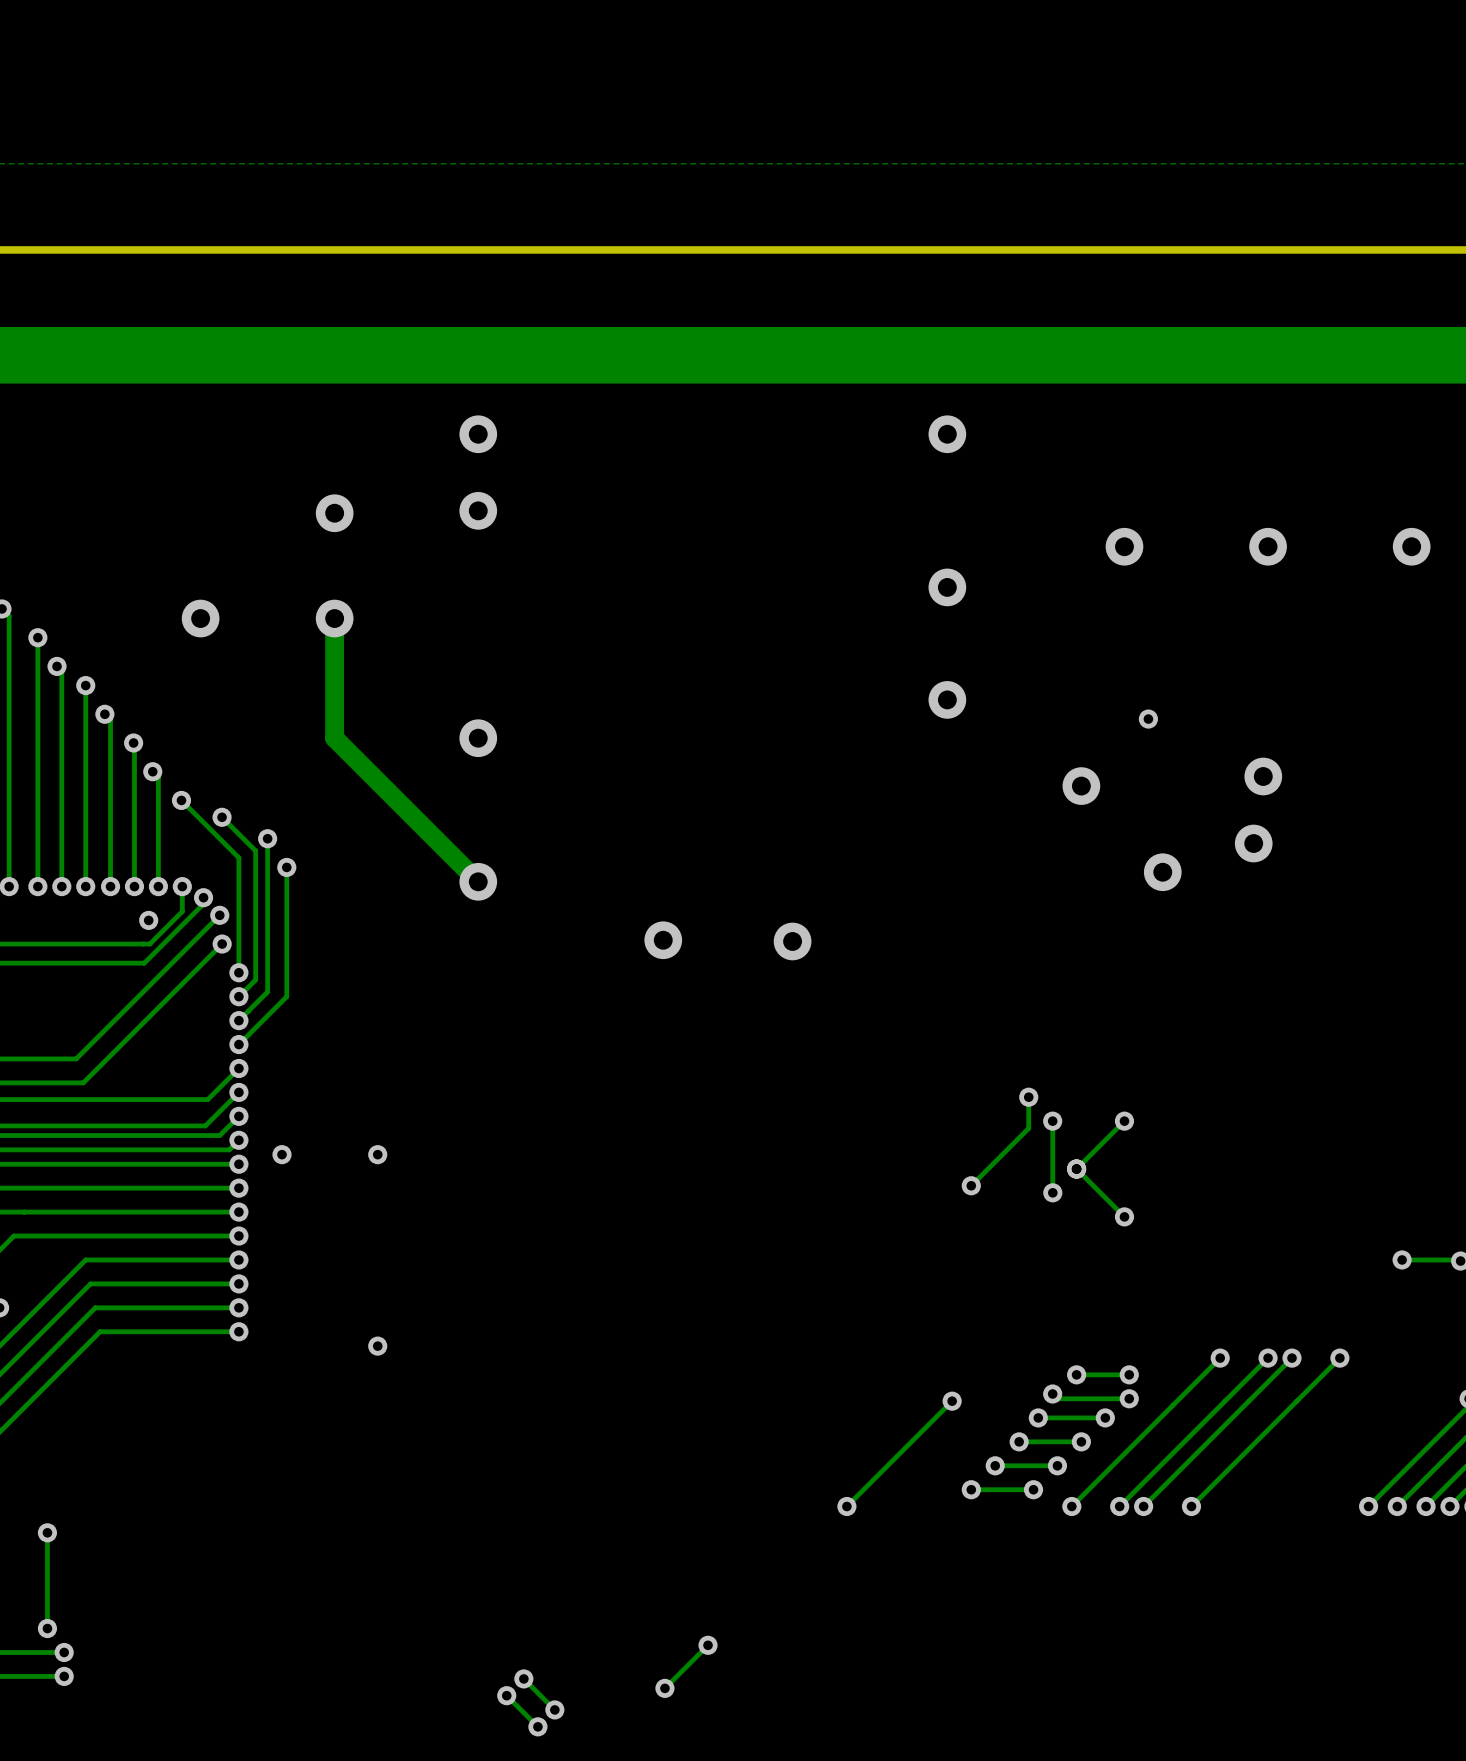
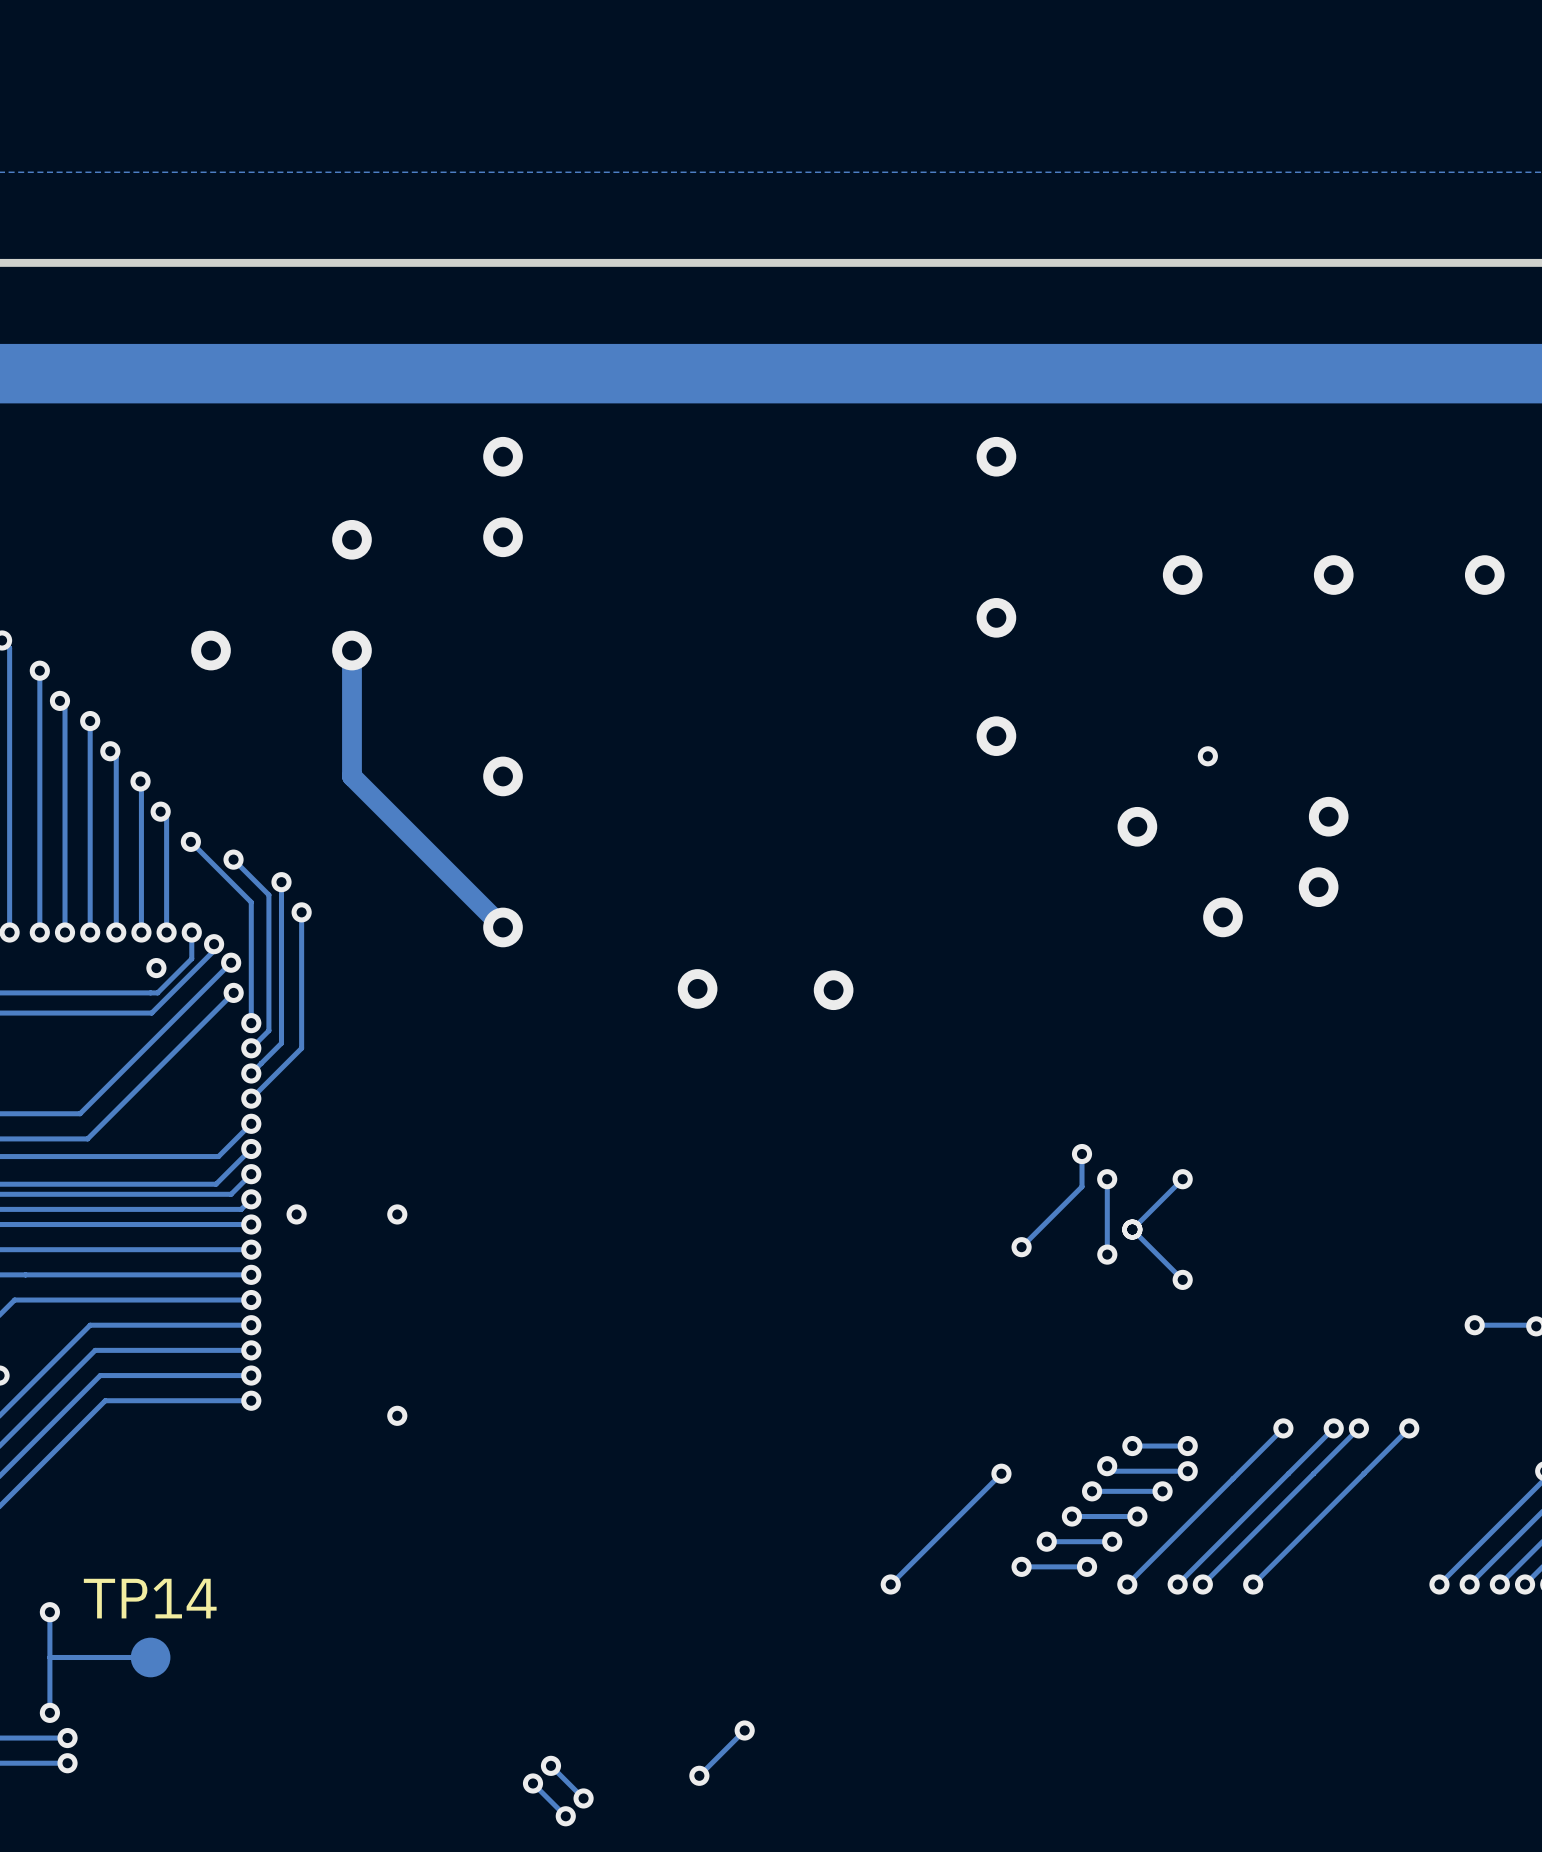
track: none -> (150, 1657) (49, 1657)
TP14: none -> (150, 1657)

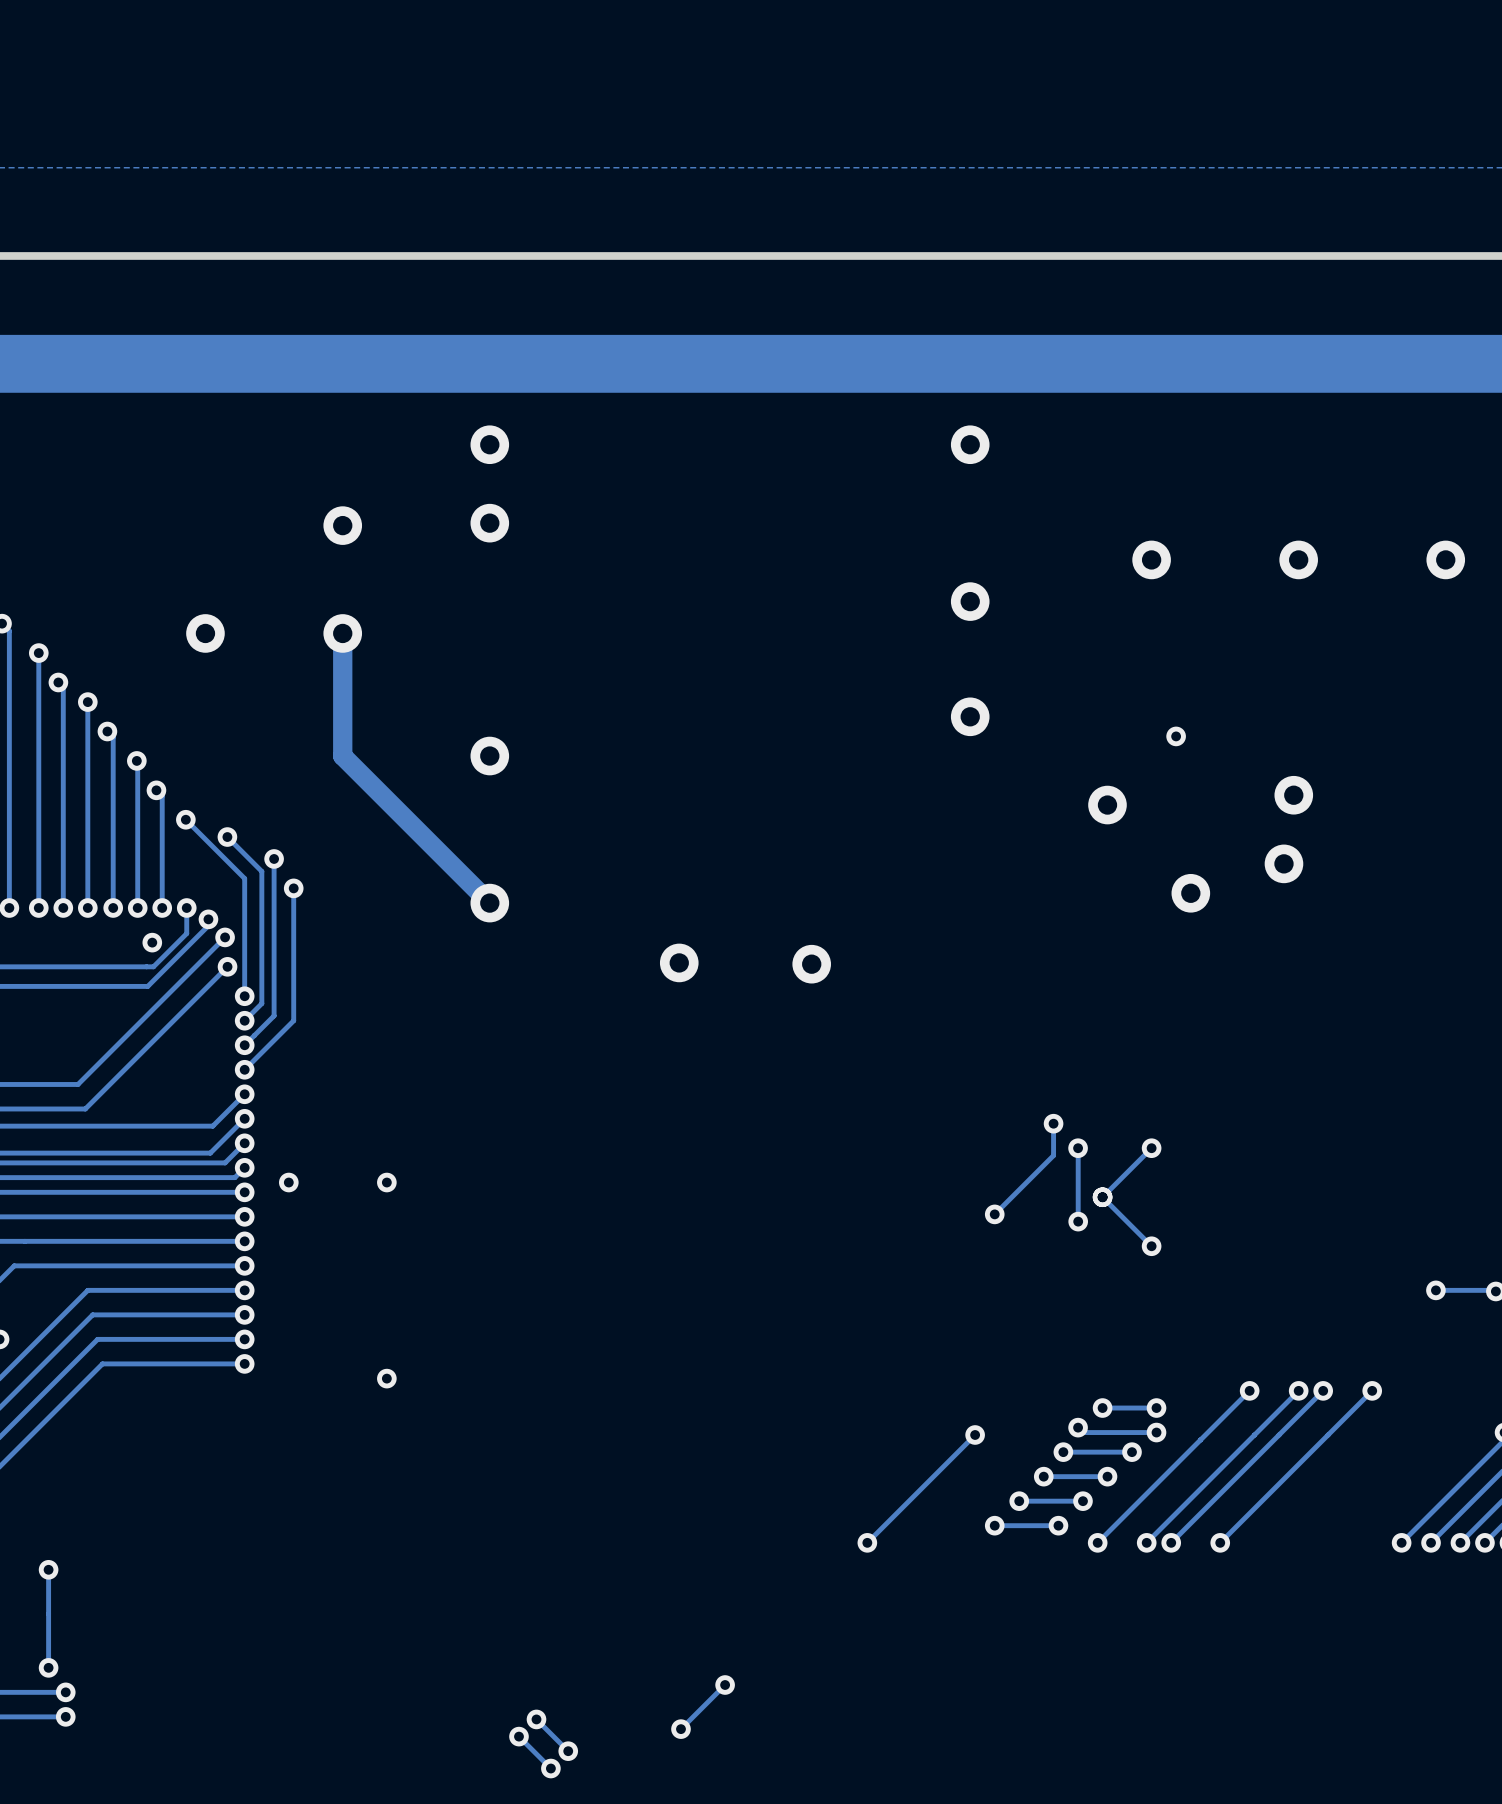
track: (150, 1657) (49, 1657) -> none
TP14: (150, 1657) -> none

